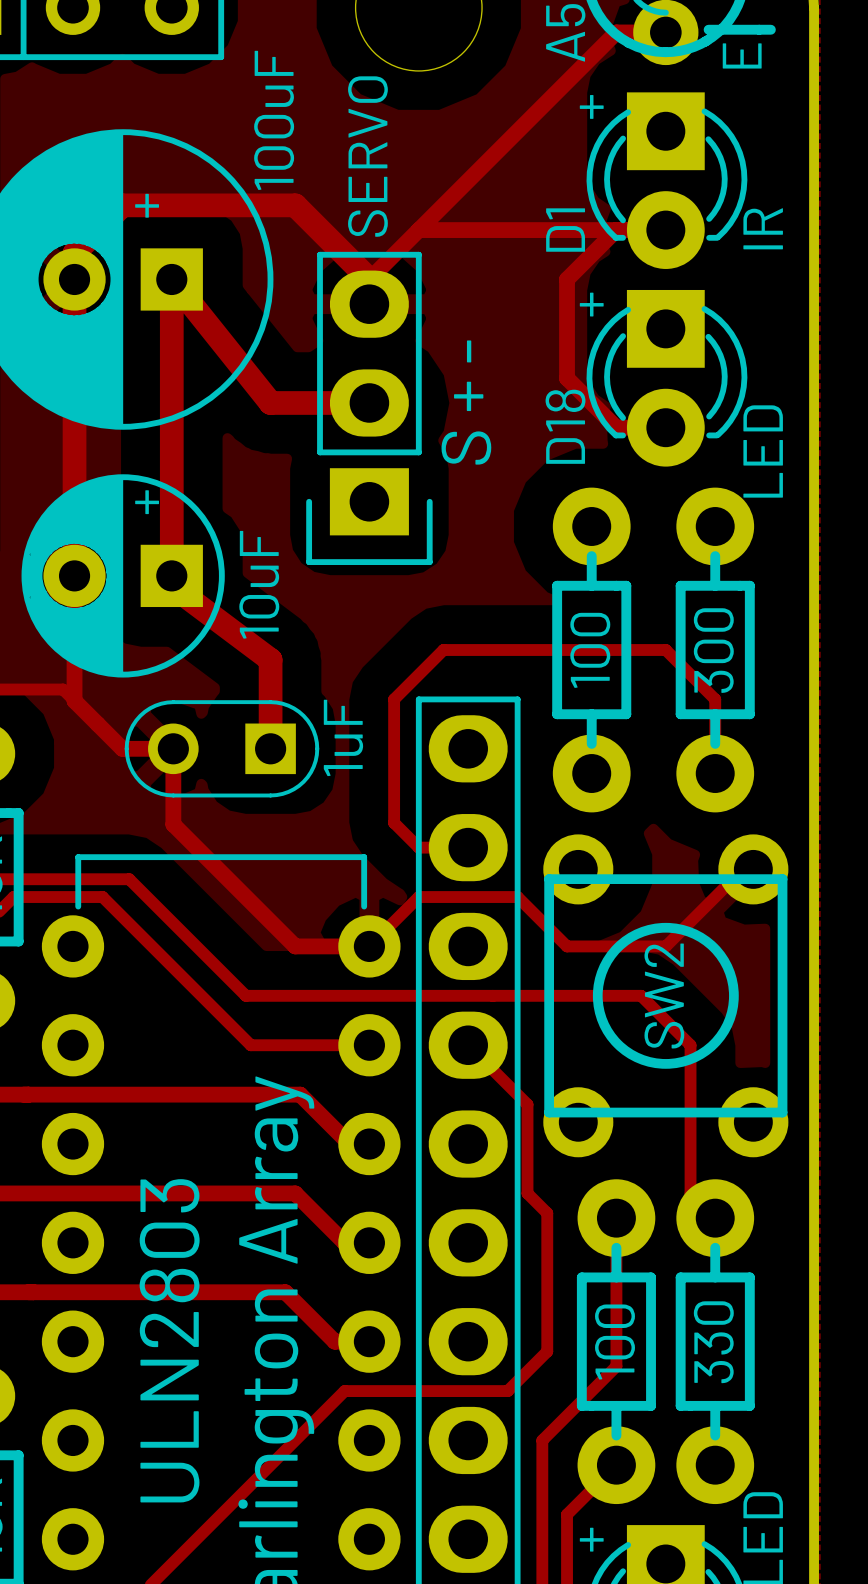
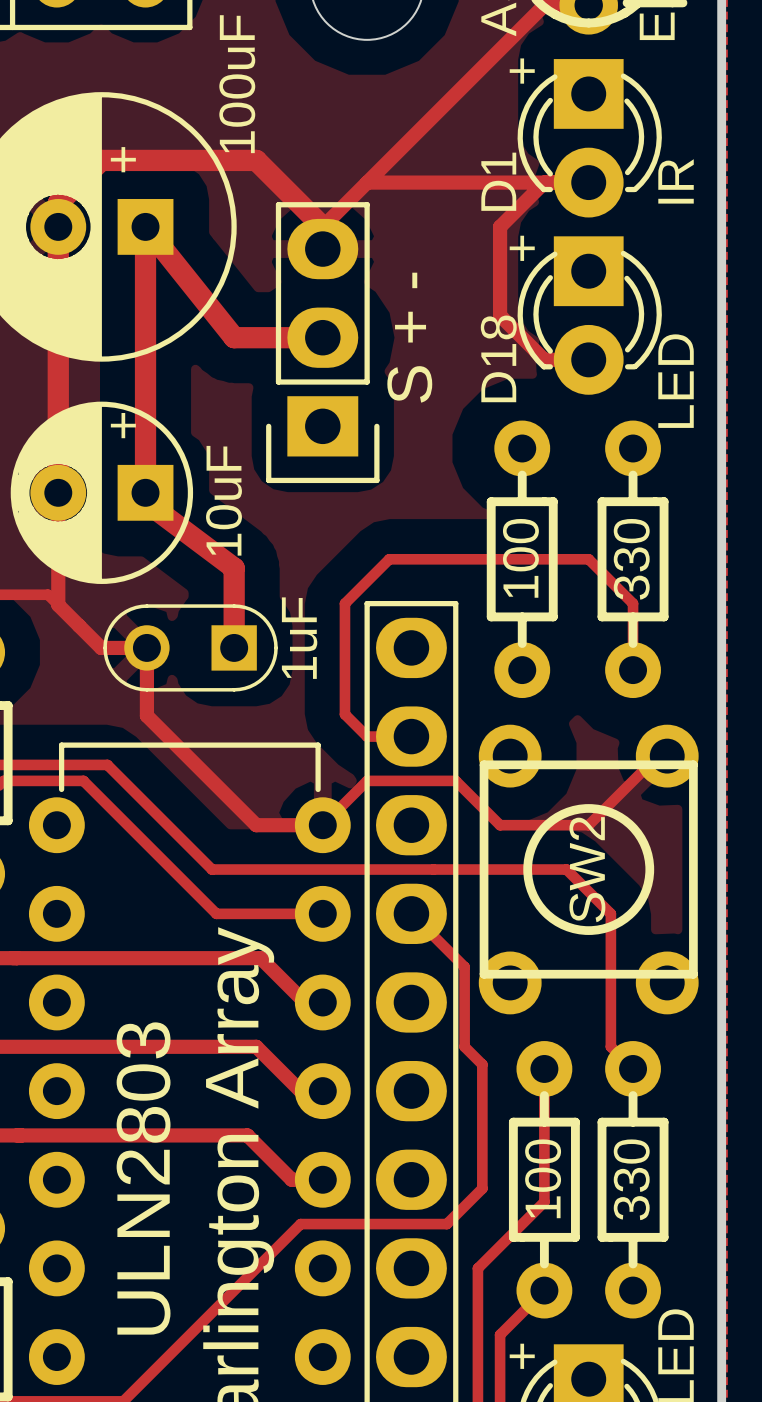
part value: SERVO (367, 156) -> none
part footprint: [552, 487, 632, 813] -> [486, 420, 558, 699]
part footprint: [675, 487, 755, 813] -> [597, 420, 669, 699]
part value: 300 (713, 650) -> 330 (631, 559)
part footprint: [576, 1179, 656, 1505] -> [508, 1041, 580, 1319]
part footprint: [675, 1179, 755, 1505] -> [597, 1041, 669, 1319]

